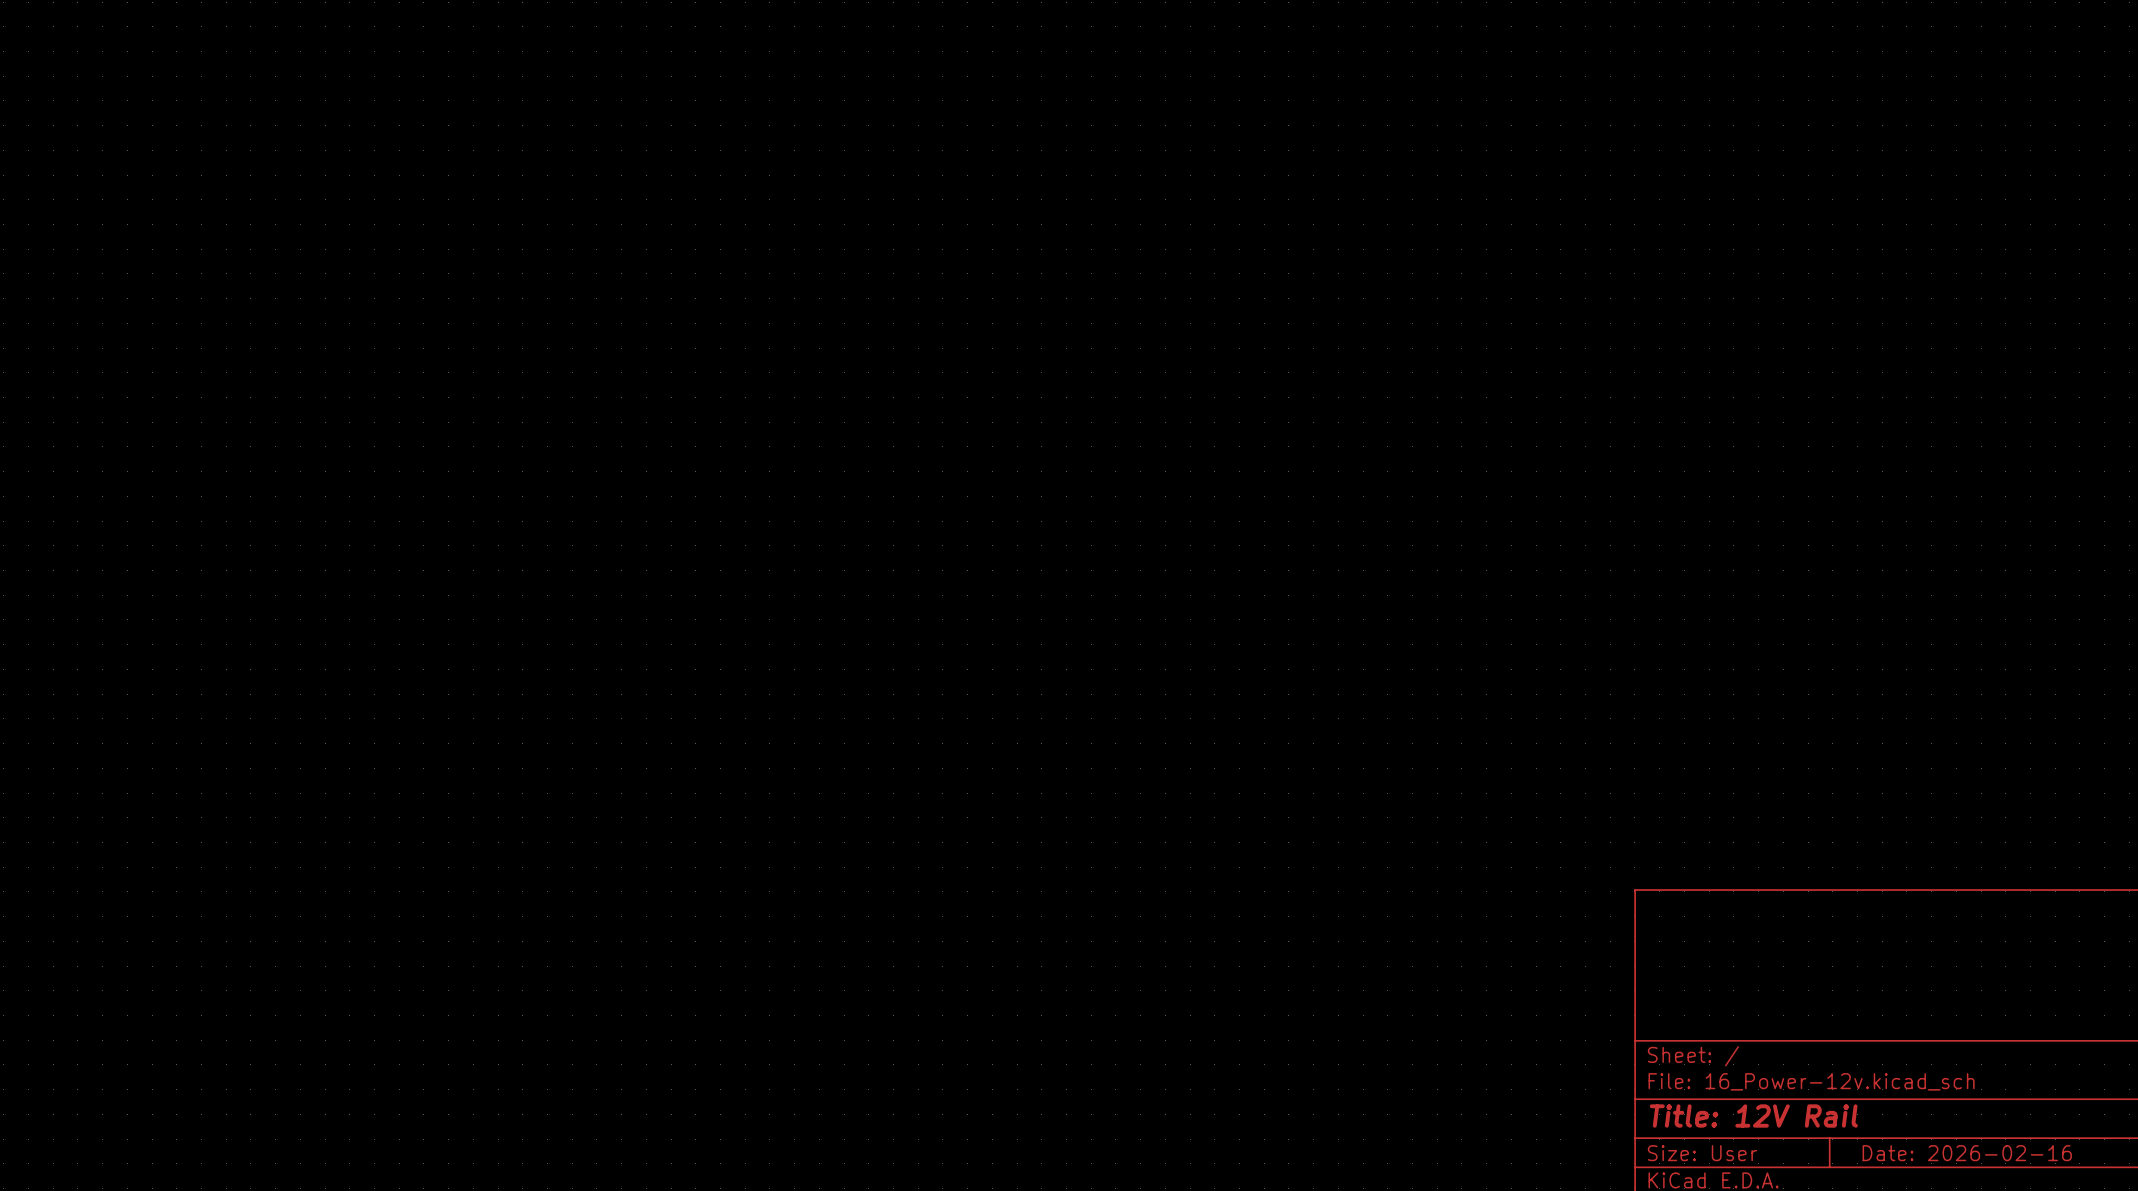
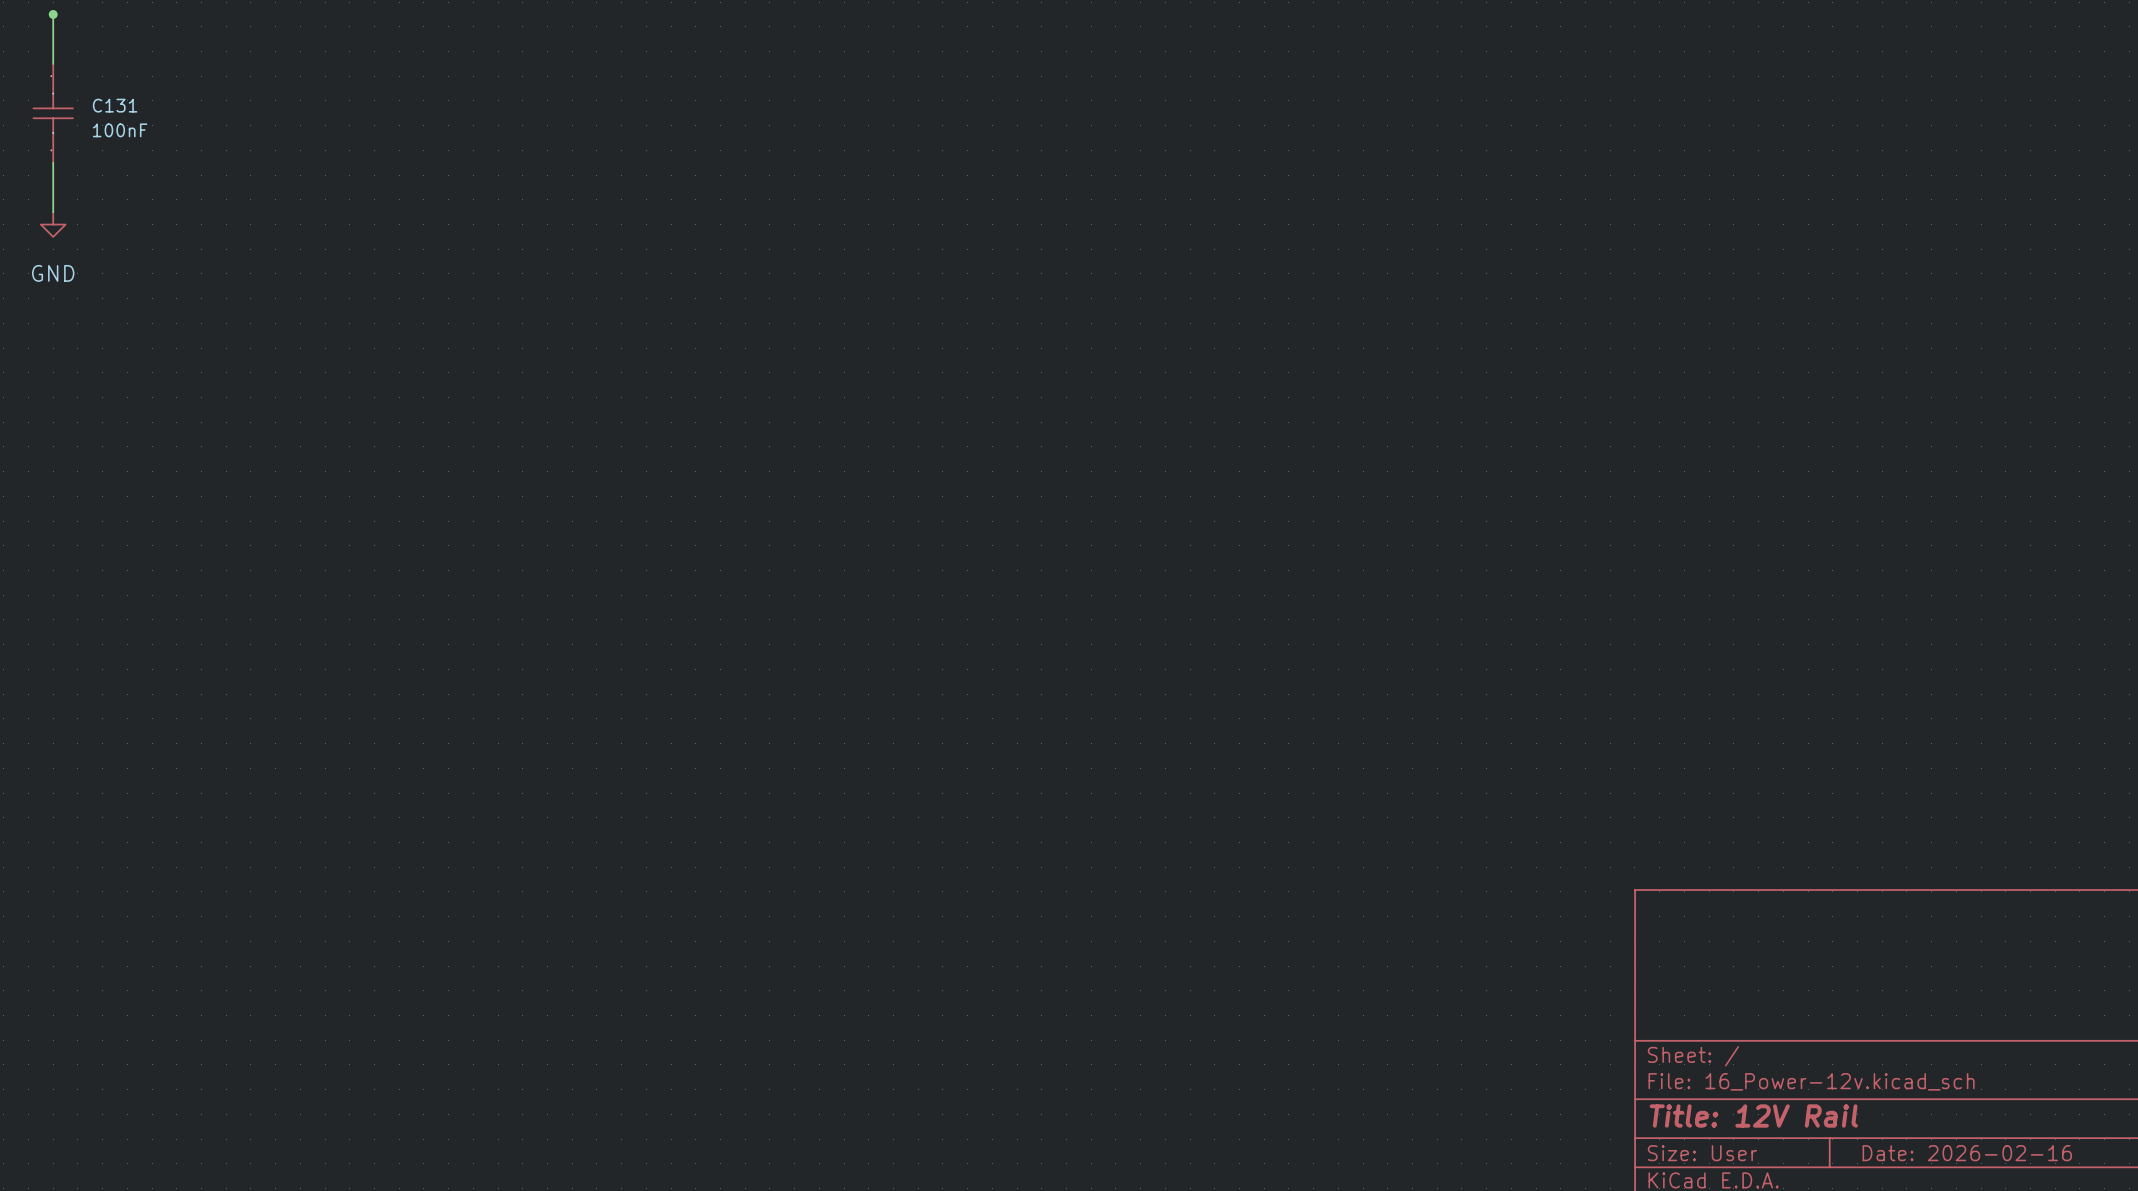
wire: none -> (53, 14) (53, 63)
junction: none -> (53, 14)
C131: none -> 100nF (53, 113)
wire: none -> (53, 162) (53, 212)
power symbol: none -> GND (53, 224)

